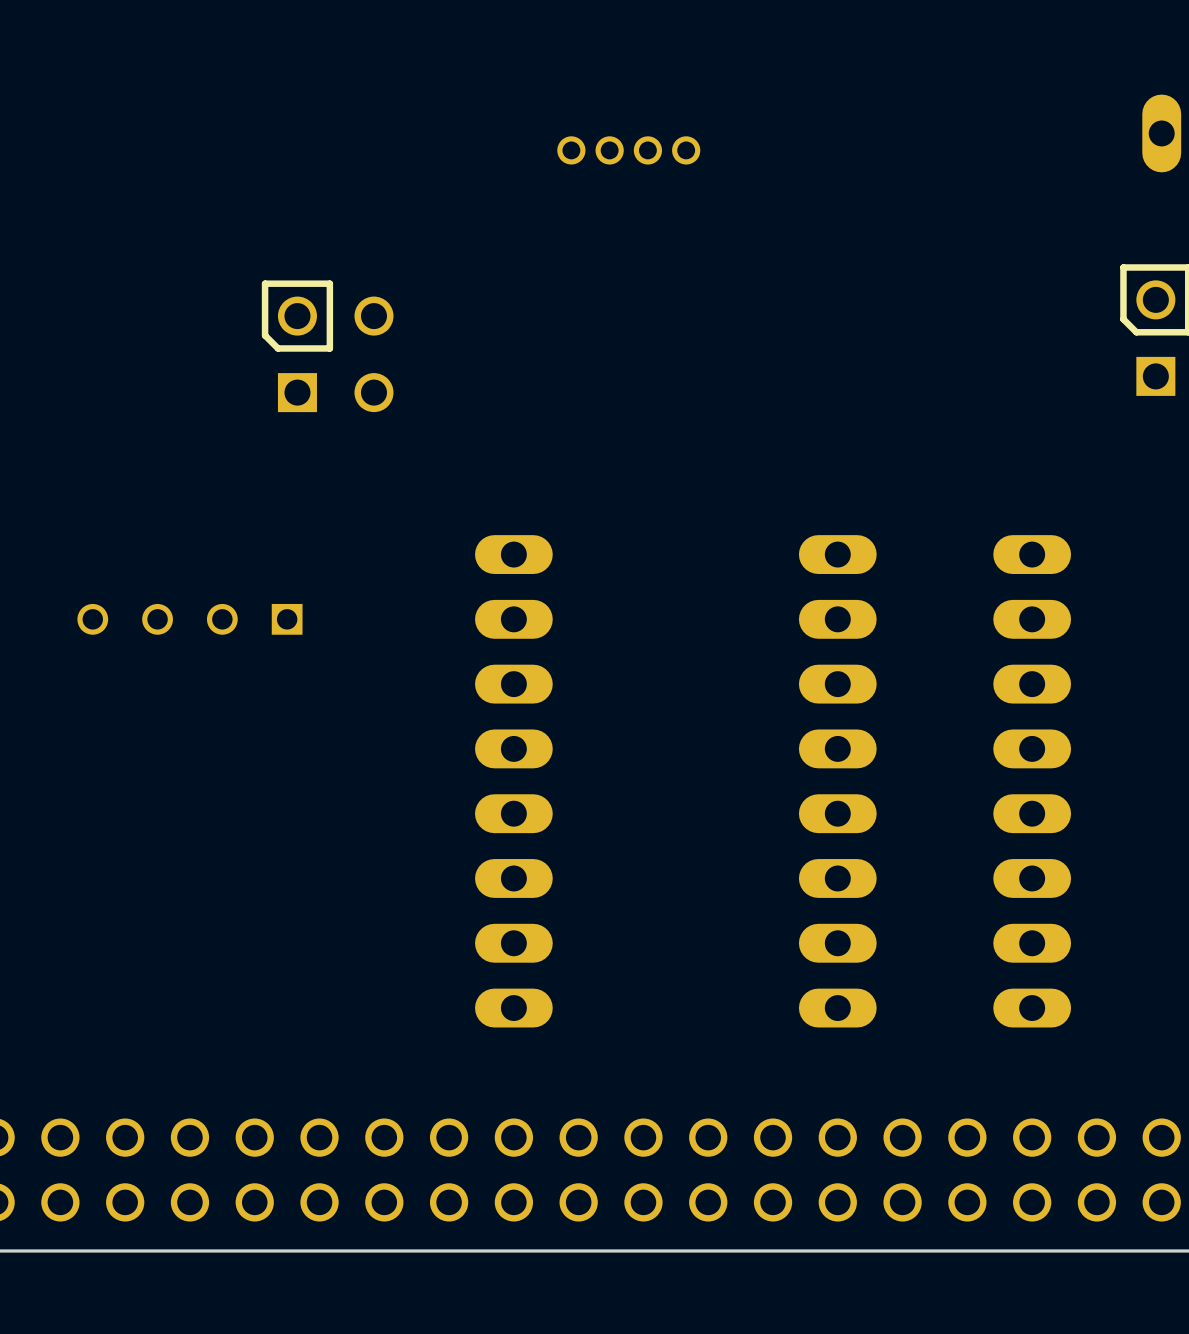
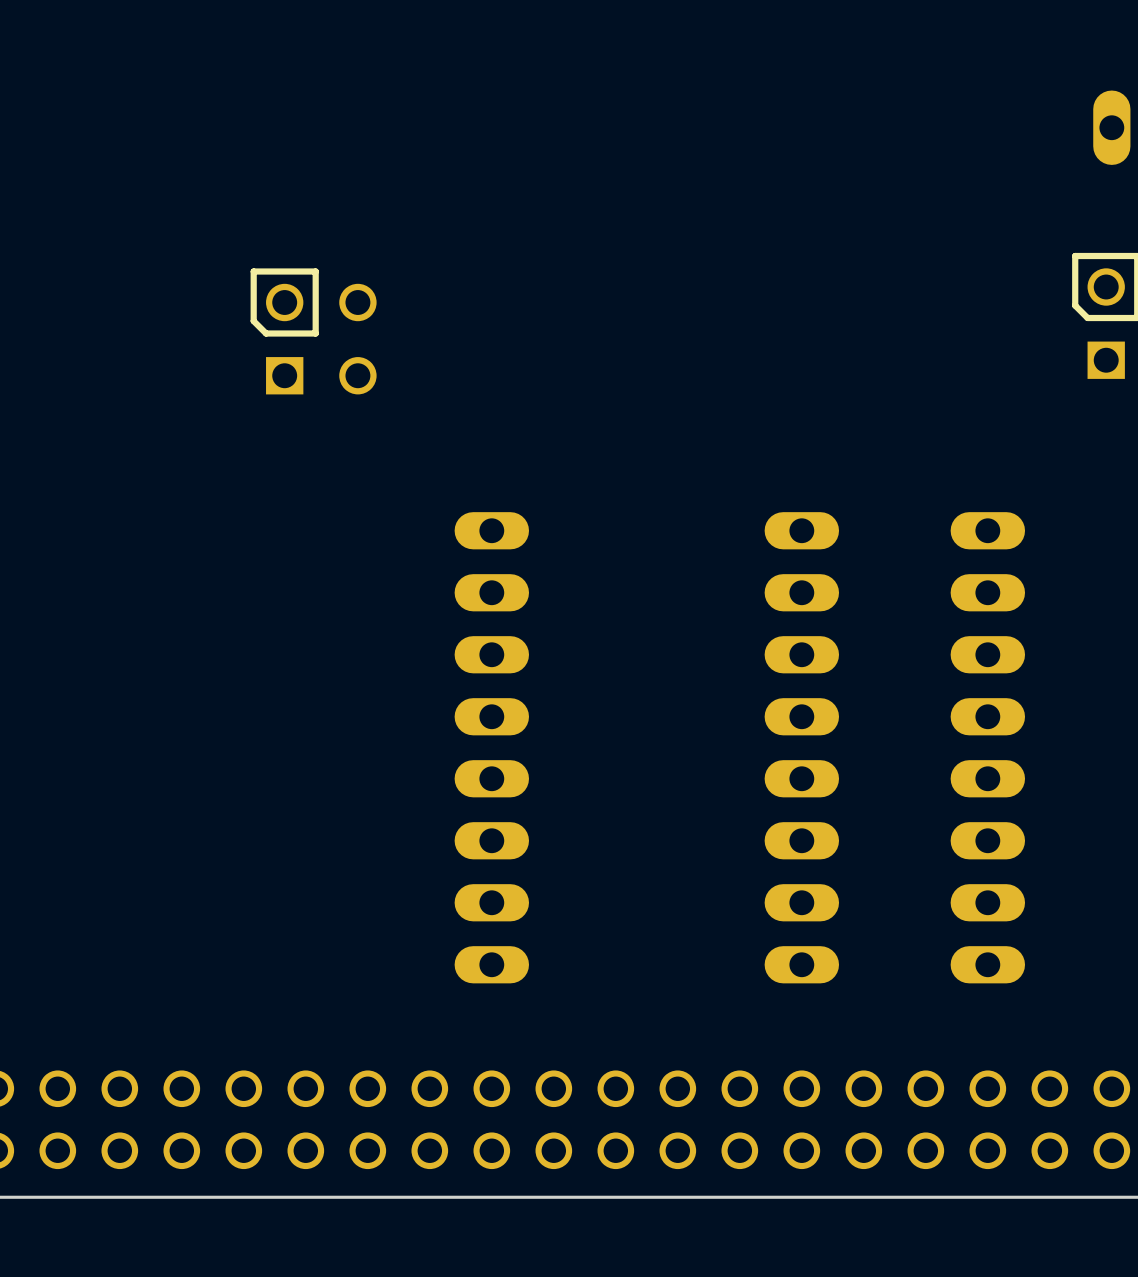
part: (628, 150) -> none
part: (189, 619) -> none

